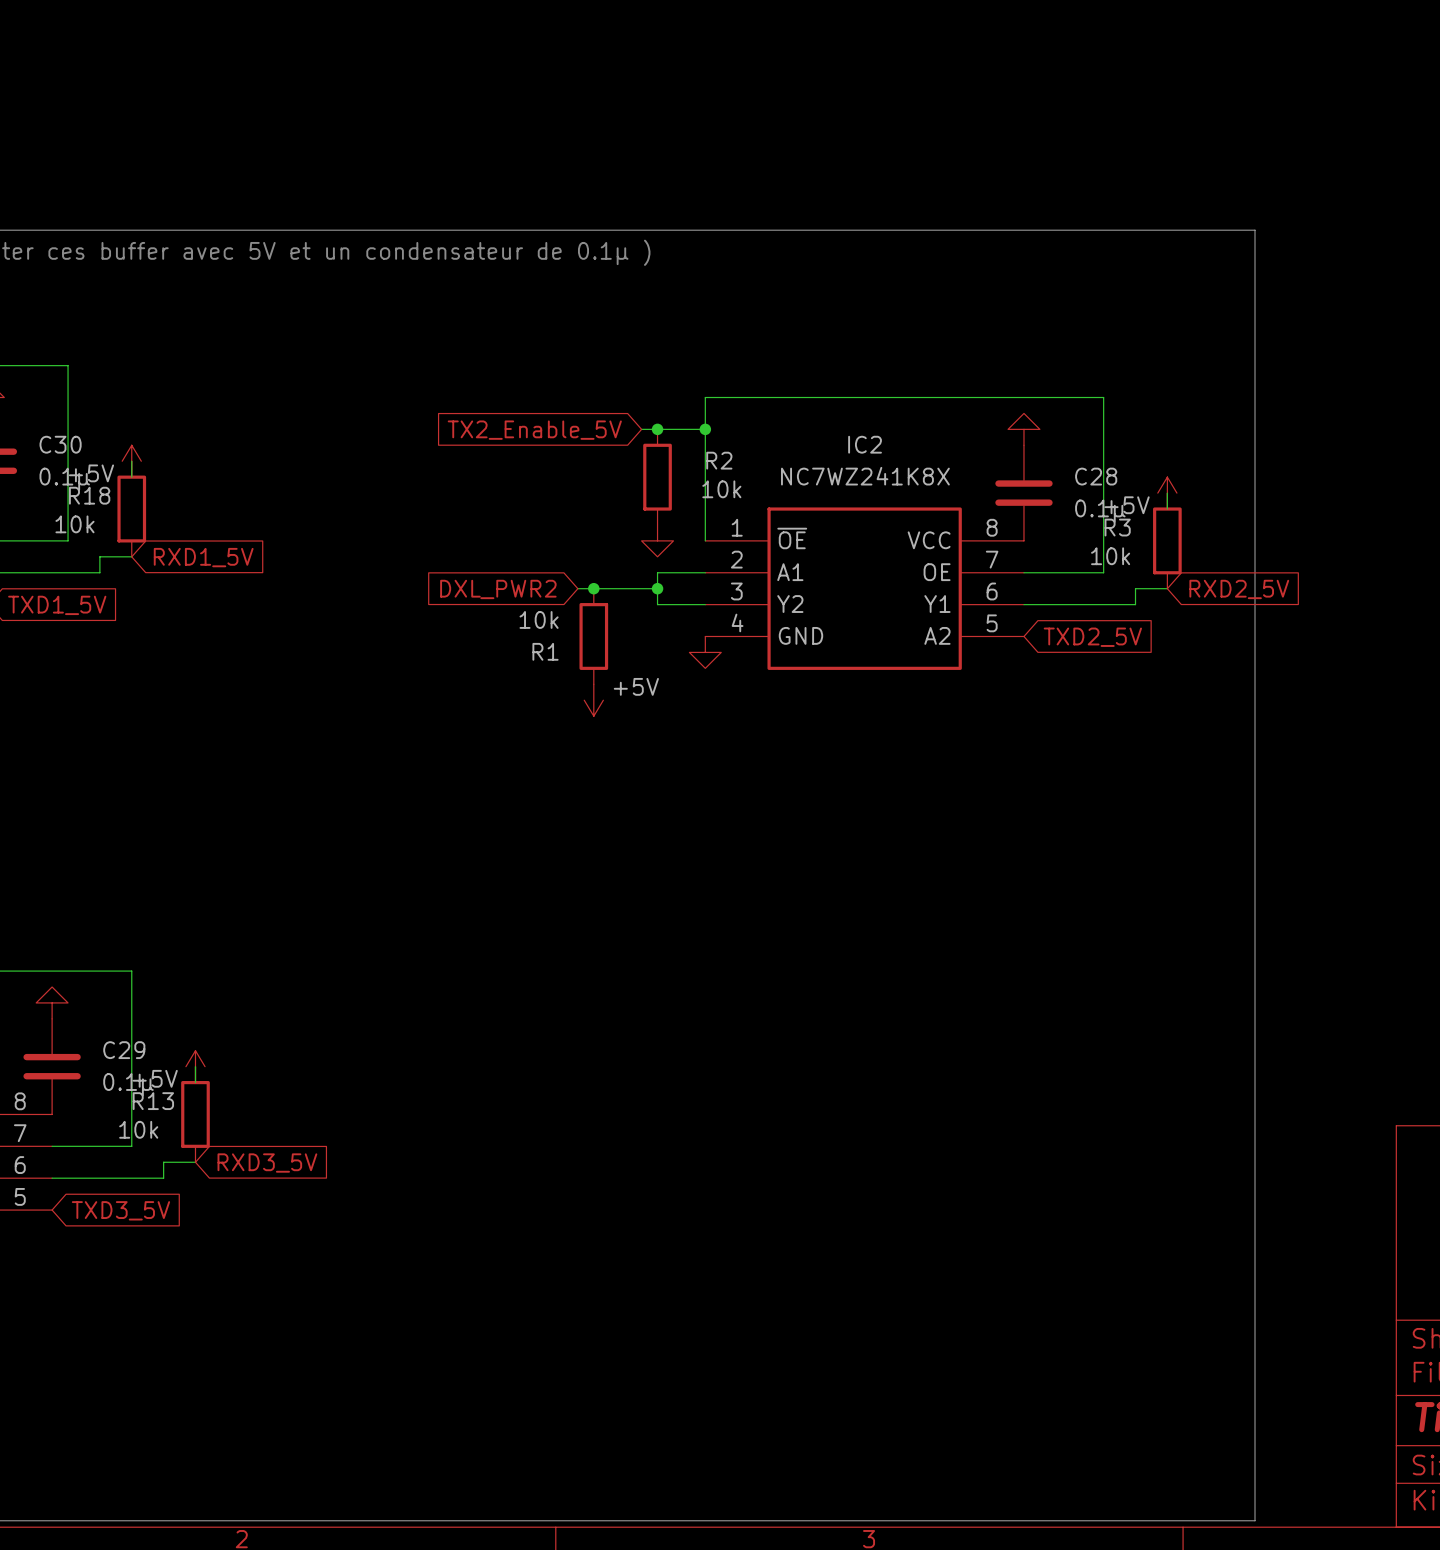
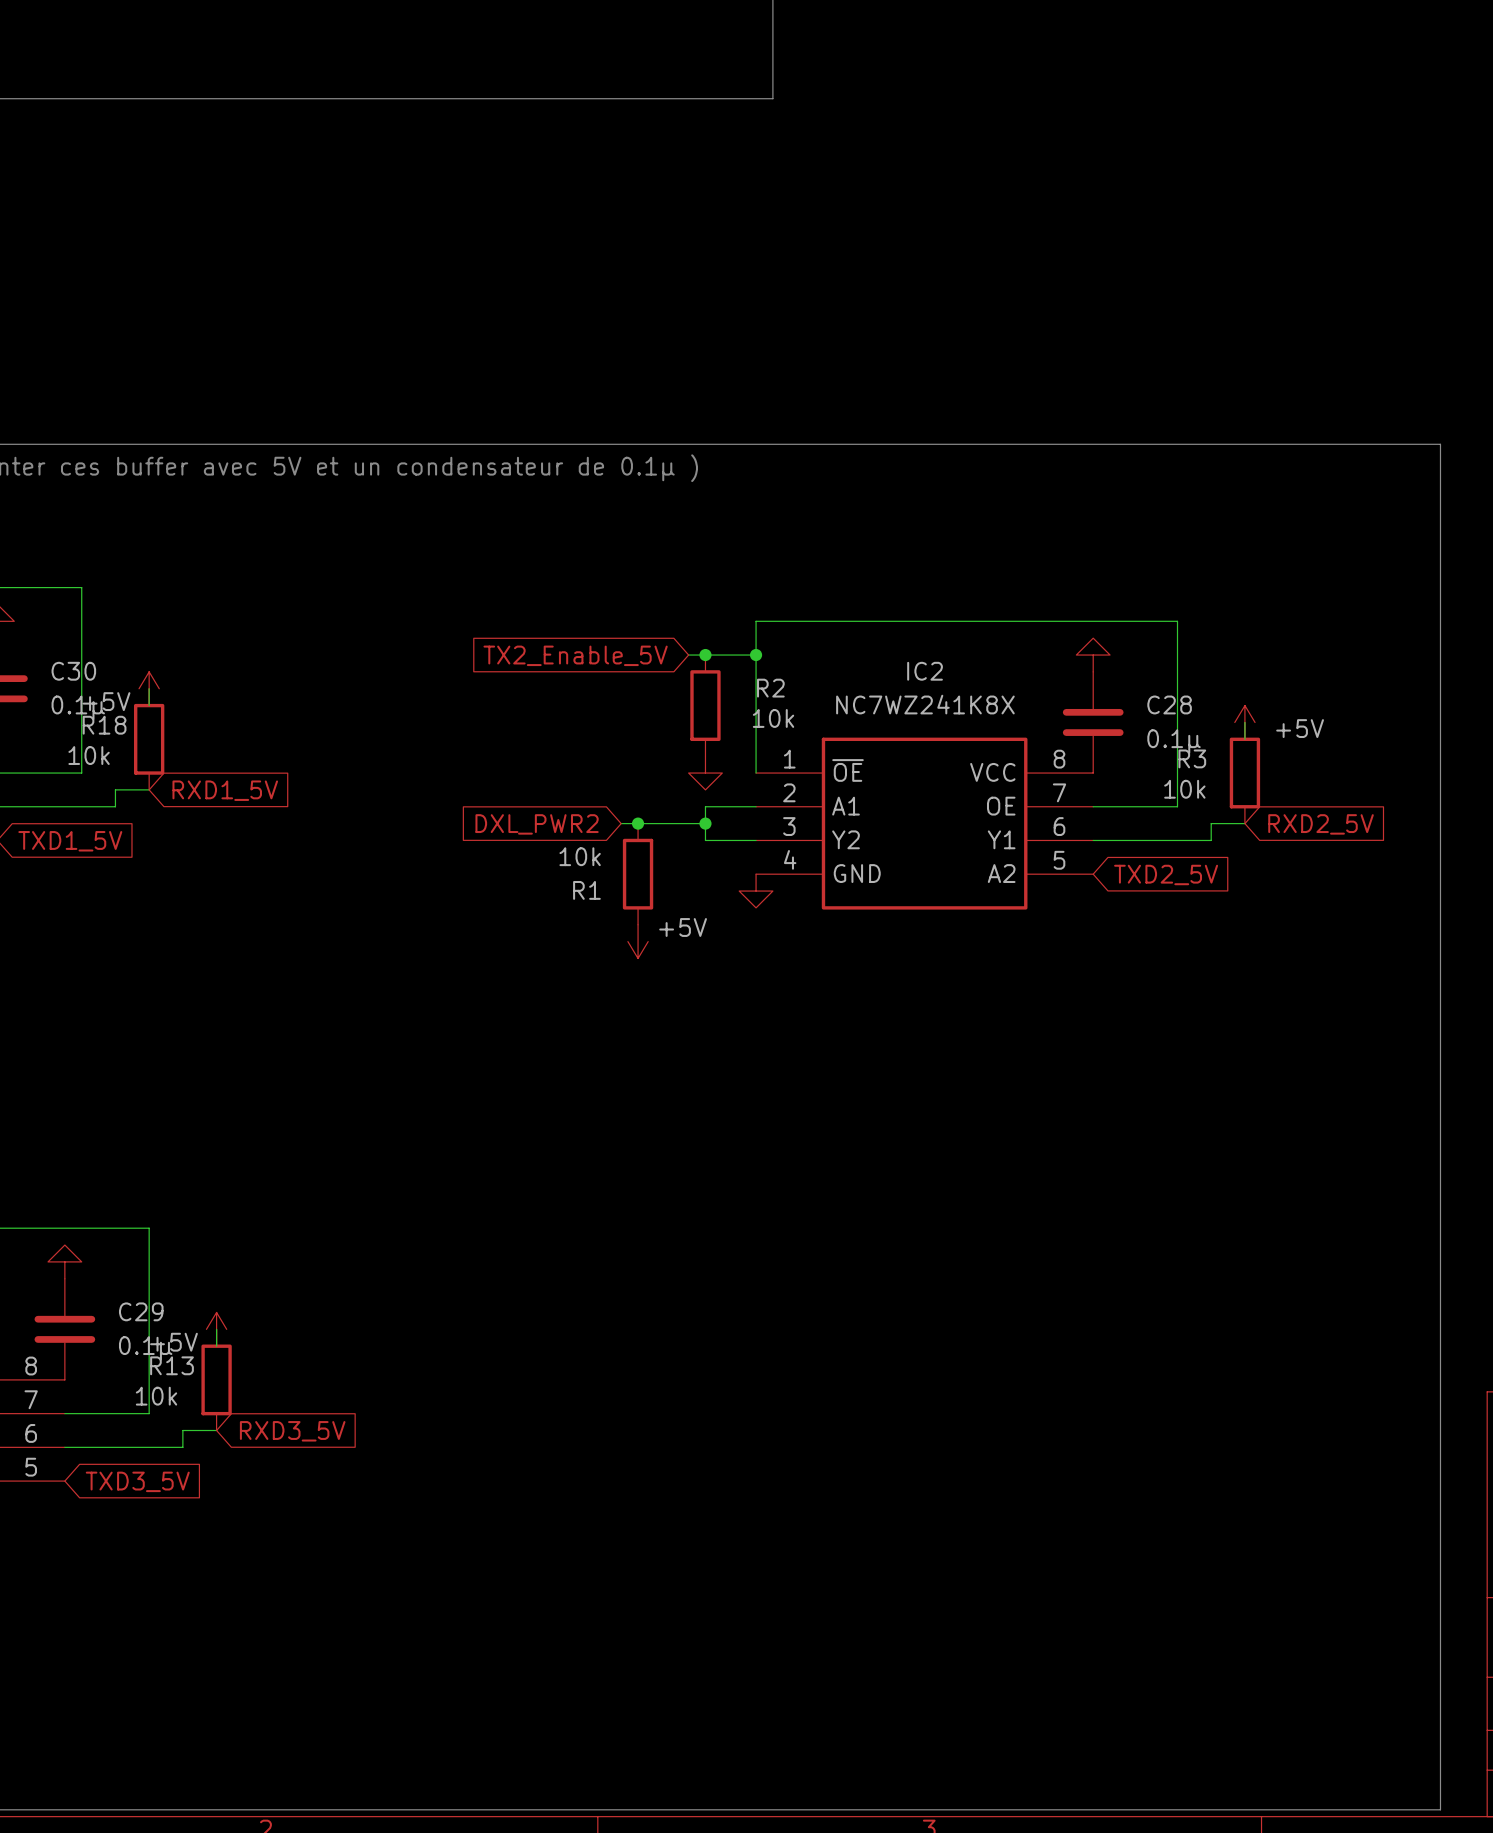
line: (1255, 230) (1255, 1520) -> (1337, 444) (1440, 444) (1440, 1809) (1337, 1809)
power symbol text position: +5V (1127, 505) -> +5V (1300, 728)

